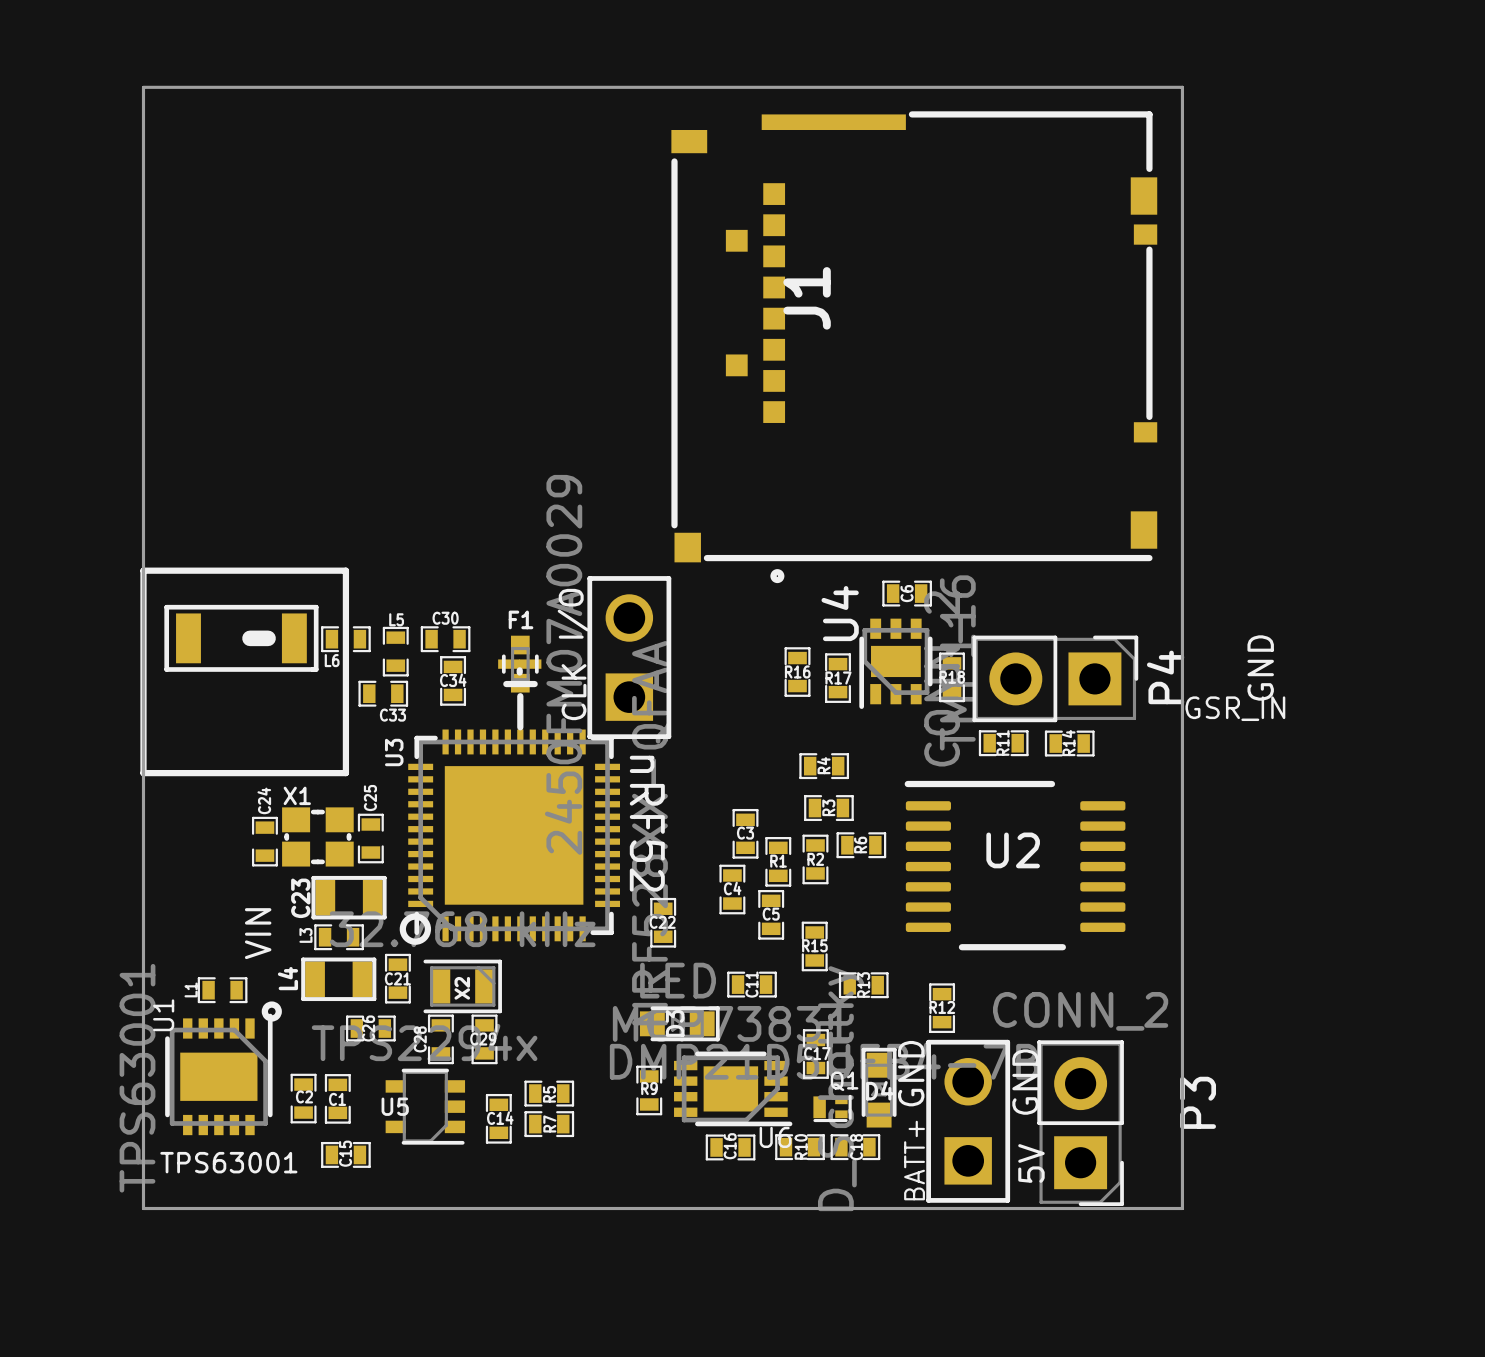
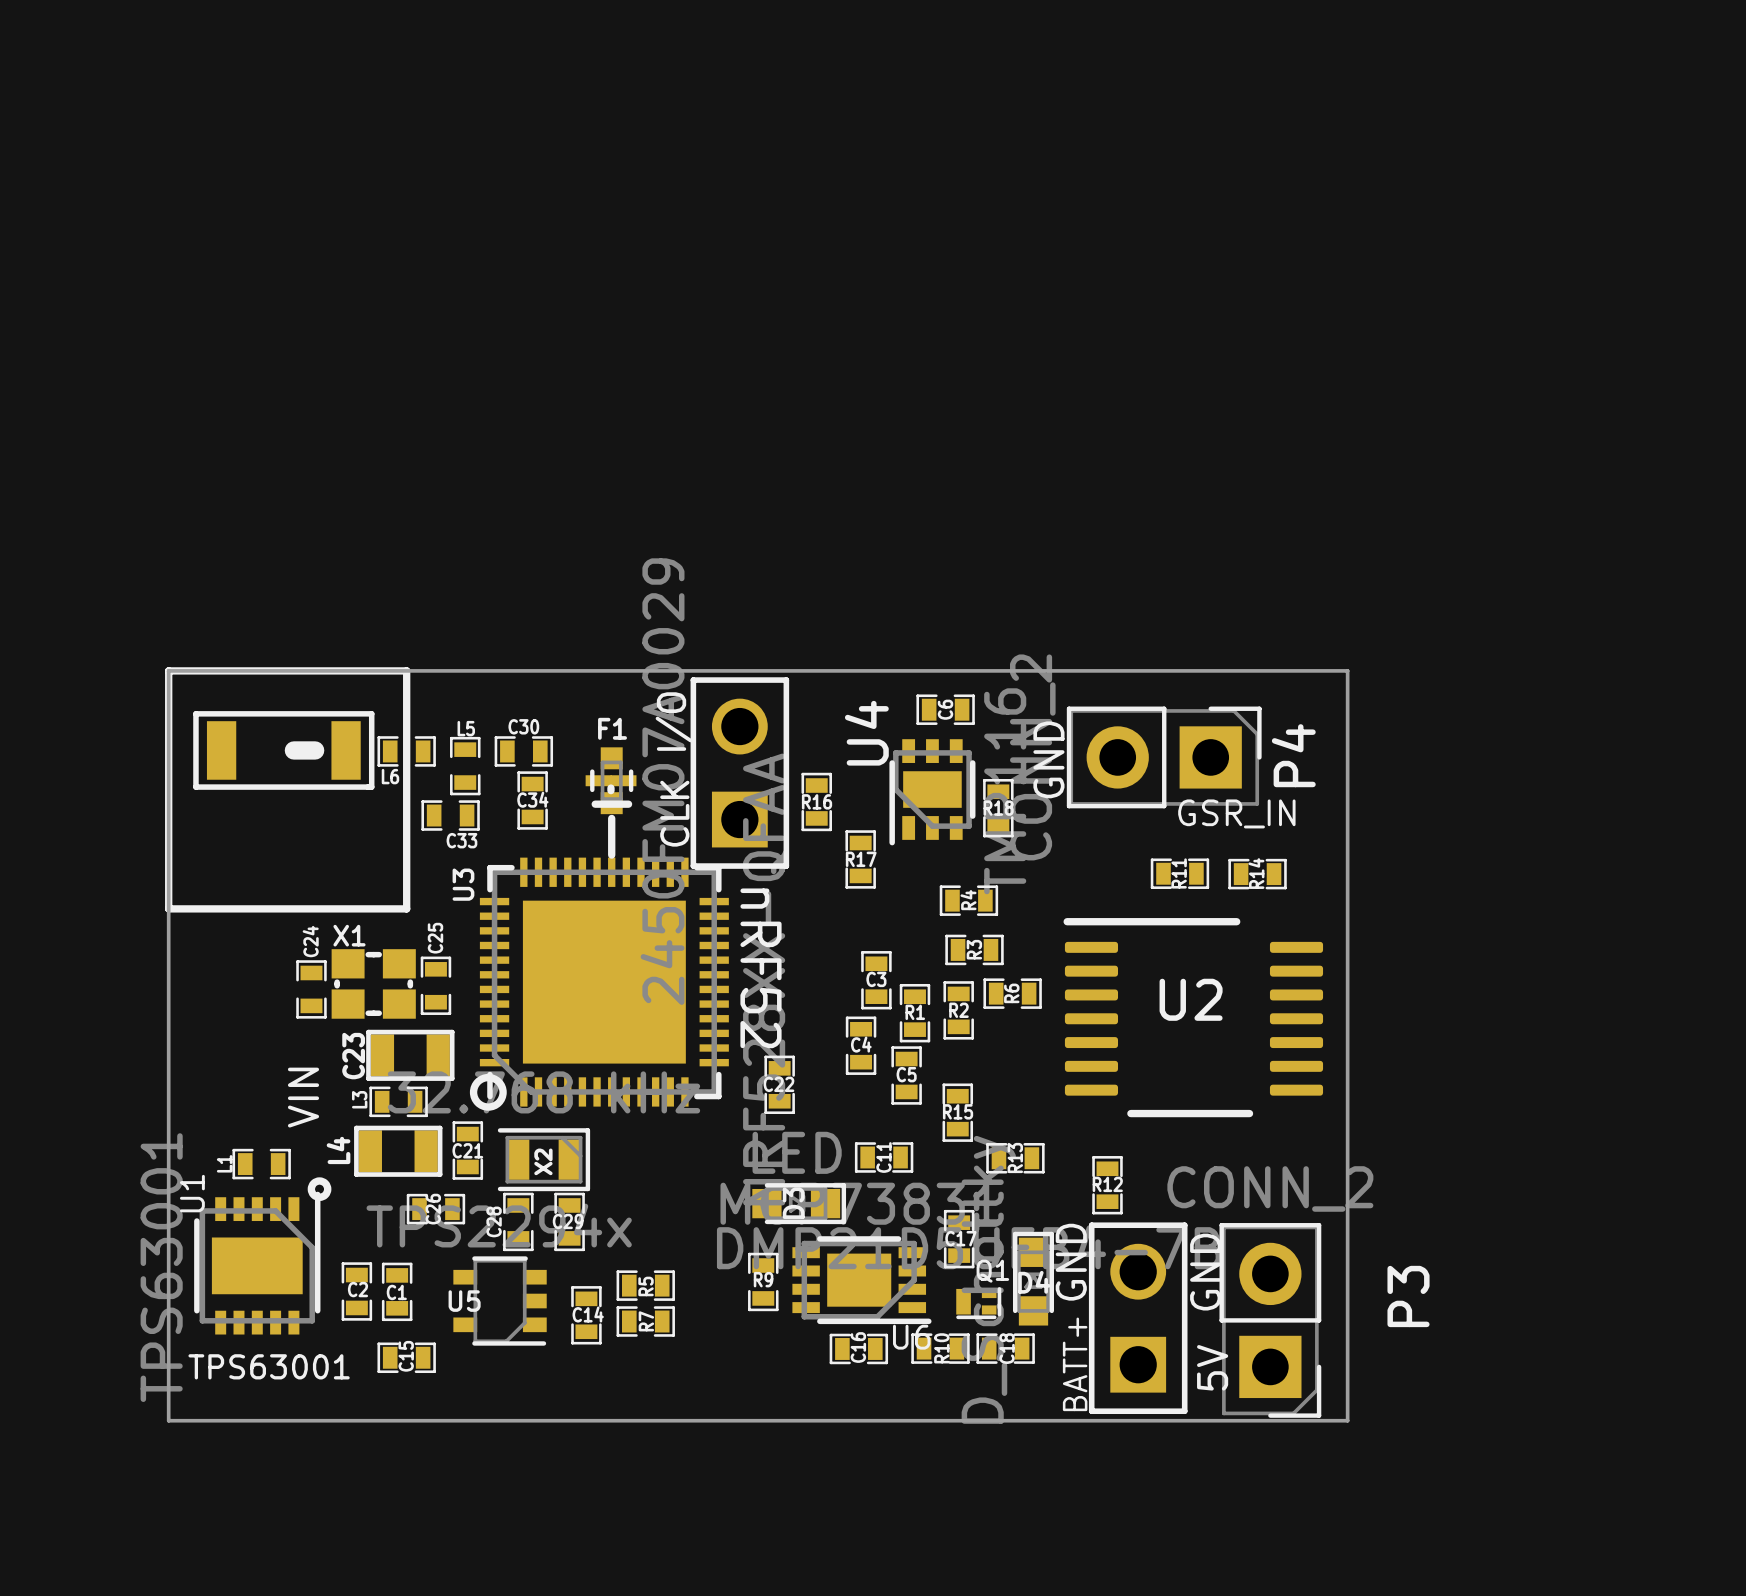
board edge: (143, 87) (1182, 87) (1182, 1208) (1146, 1208) -> (168, 670) (1347, 670) (1347, 1420)
board edge: (143, 87) (143, 570) -> none
J1: (914, 347) -> none
C6 position: (907, 593) -> (945, 709)
U4 position: (895, 663) -> (932, 792)
text position: GND (1260, 668) -> GND (1048, 759)
R16 position: (797, 672) -> (816, 801)
R18 position: (951, 677) -> (998, 808)
R17 position: (838, 678) -> (860, 859)
P4 position: (1055, 678) -> (1164, 757)
text position: GSR_IN (1235, 708) -> GSR_IN (1236, 813)

